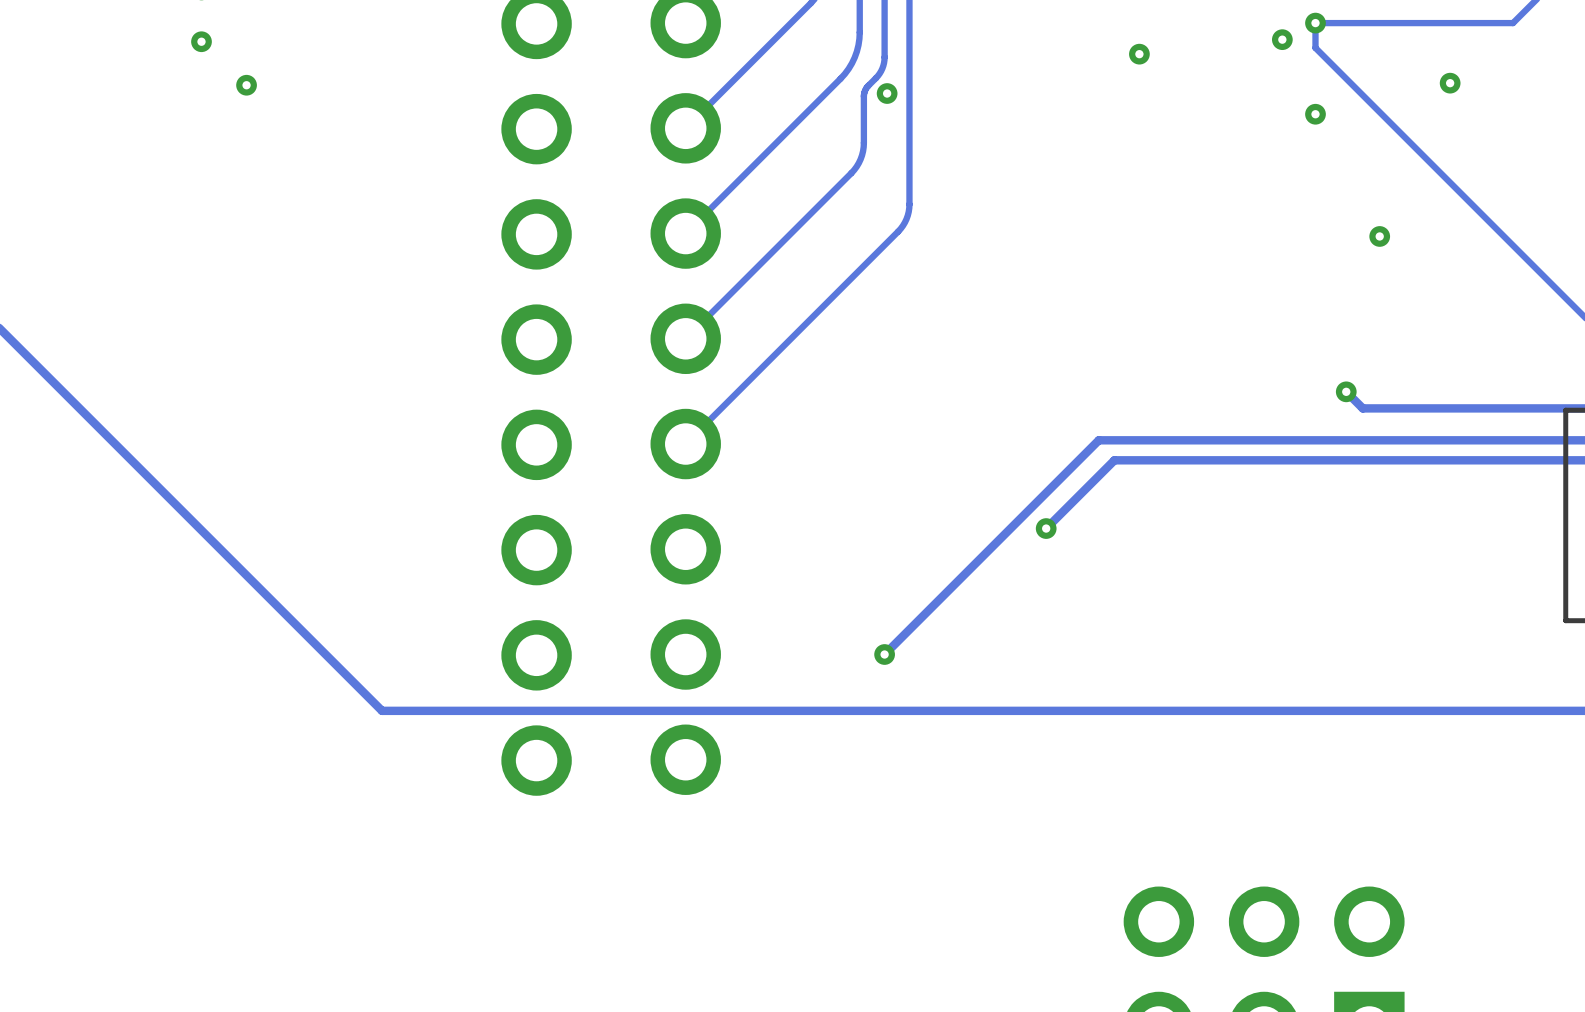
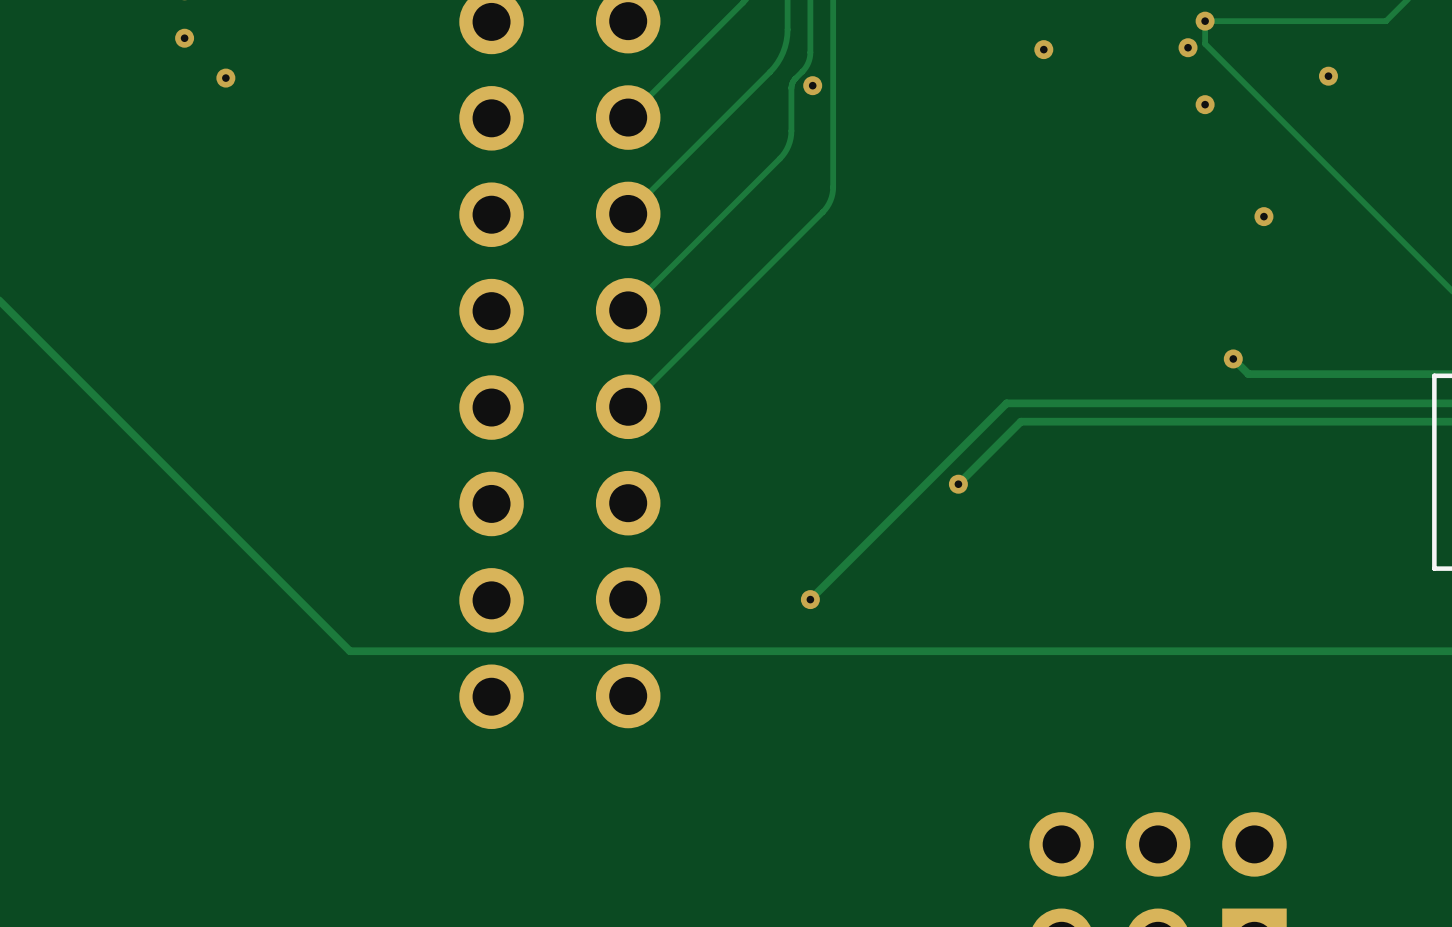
via position: (1282, 39) -> (1188, 47)

